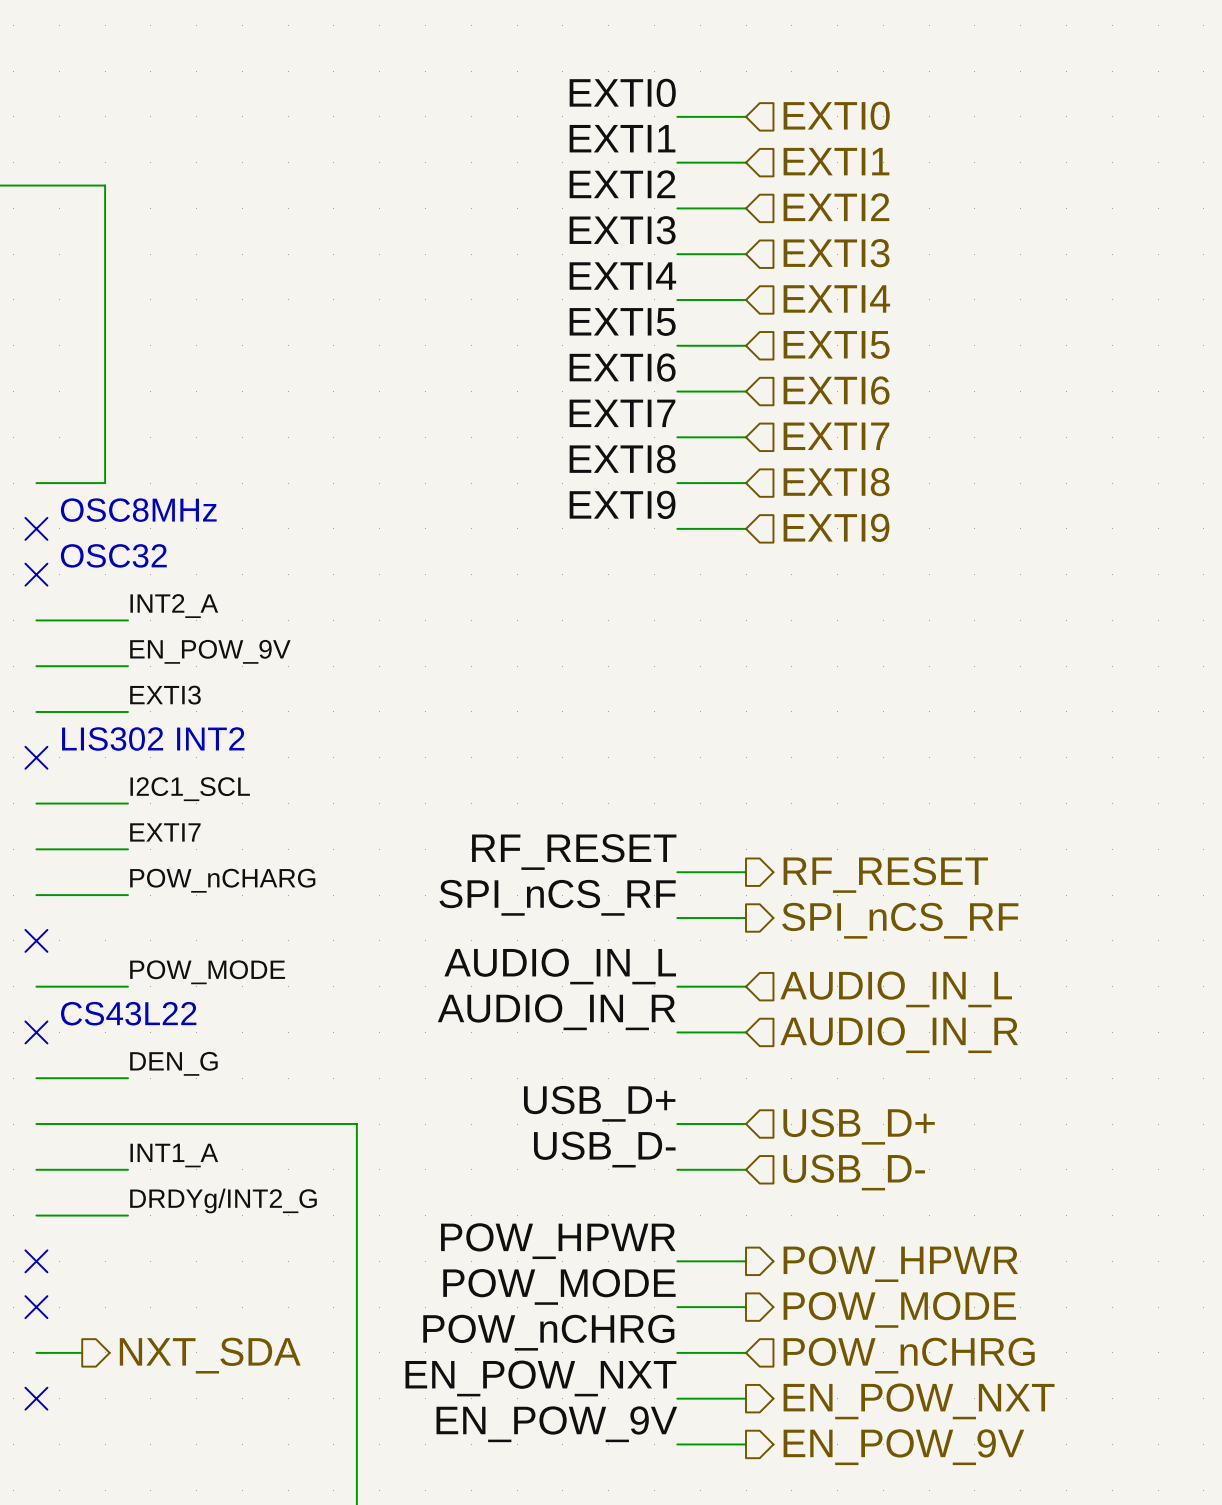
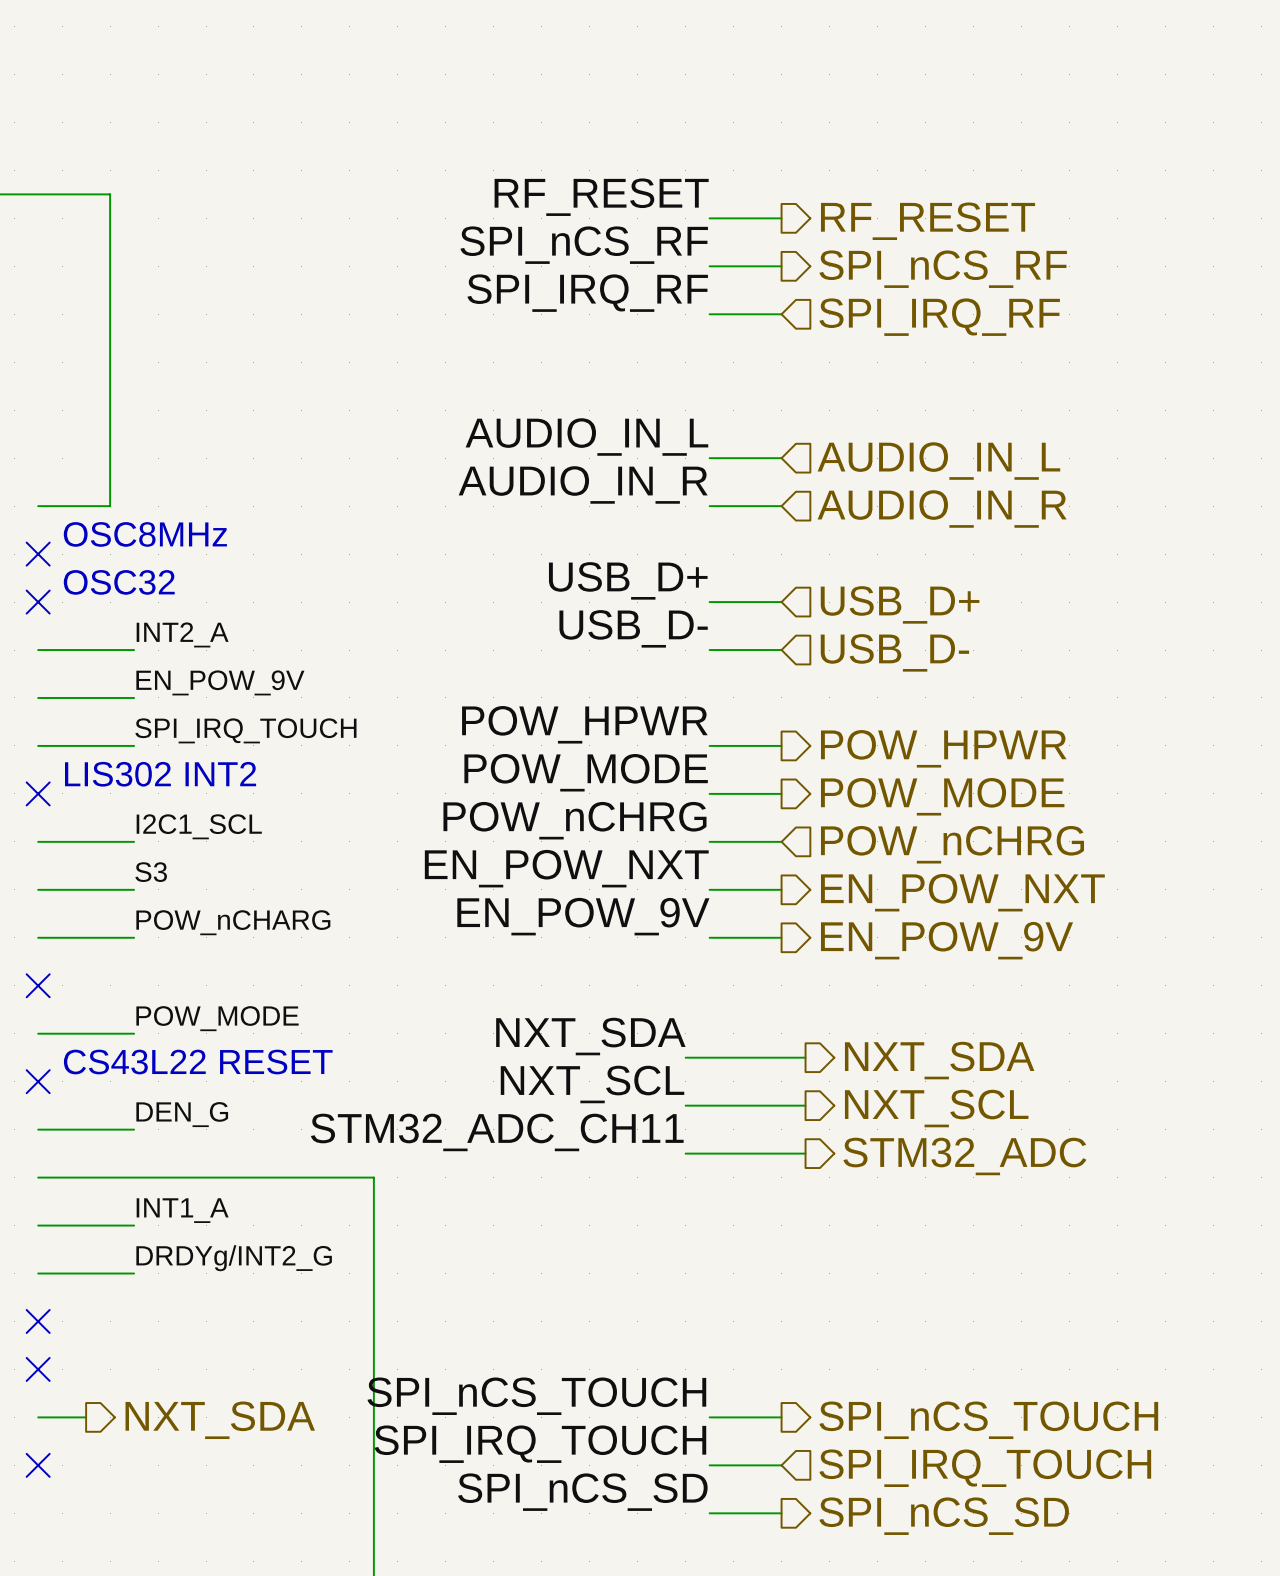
label: EXTI0 (622, 92) -> none
hierarchical label: EXTI0 (836, 115) -> none
wire: (677, 116) (746, 116) -> none
label: EXTI1 (622, 138) -> none
hierarchical label: EXTI1 (836, 161) -> none
wire: (677, 162) (746, 162) -> none
label: EXTI2 (622, 184) -> RF_RESET (601, 197)
hierarchical label shape: input (836, 207) -> output (928, 221)
hierarchical label: EXTI2 (836, 207) -> RF_RESET (928, 221)
label: EXTI3 (622, 230) -> SPI_nCS_RF (584, 245)
hierarchical label shape: input (836, 253) -> output (943, 269)
hierarchical label: EXTI3 (836, 253) -> SPI_nCS_RF (943, 269)
label: EXTI4 (622, 276) -> SPI_IRQ_RF (587, 293)
hierarchical label: EXTI4 (836, 298) -> SPI_IRQ_RF (939, 317)
label: EXTI5 (622, 322) -> none
hierarchical label: EXTI5 (836, 344) -> none
wire: (677, 345) (746, 345) -> none
label: EXTI6 (622, 367) -> none
hierarchical label: EXTI6 (836, 390) -> none
wire: (677, 391) (746, 391) -> (709, 841) (781, 841)
label: EXTI7 (622, 413) -> AUDIO_IN_L (586, 437)
hierarchical label: EXTI7 (836, 436) -> AUDIO_IN_L (938, 461)
label: EXTI8 (622, 459) -> AUDIO_IN_R (583, 484)
hierarchical label: EXTI8 (836, 482) -> AUDIO_IN_R (942, 509)
label: EXTI9 (622, 504) -> none
hierarchical label: EXTI9 (836, 527) -> none
wire: (677, 528) (746, 528) -> none
label: none -> USB_D+ (628, 580)
hierarchical label: none -> USB_D+ (900, 604)
label: none -> USB_D- (633, 628)
hierarchical label: none -> USB_D- (894, 652)
label: none -> POW_HPWR (584, 724)
label: EXTI3 (165, 695) -> SPI_IRQ_TOUCH (245, 730)
hierarchical label: none -> POW_HPWR (943, 748)
label: none -> POW_MODE (586, 772)
hierarchical label: none -> POW_MODE (942, 796)
label: none -> POW_nCHRG (574, 820)
hierarchical label: none -> POW_nCHRG (952, 844)
label: none -> EN_POW_NXT (566, 868)
label: EXTI7 (165, 832) -> S3 (151, 872)
label: RF_RESET (574, 852) -> none
hierarchical label: none -> EN_POW_NXT (962, 892)
wire: (677, 872) (746, 872) -> none
label: none -> EN_POW_9V (583, 916)
hierarchical label: RF_RESET (885, 874) -> none
label: SPI_nCS_RF (557, 897) -> none
hierarchical label: none -> EN_POW_9V (947, 940)
wire: (677, 918) (746, 918) -> none
hierarchical label: SPI_nCS_RF (900, 920) -> none
label: AUDIO_IN_L (560, 966) -> none
wire: (677, 986) (746, 986) -> (709, 602) (781, 602)
label: none -> NXT_SDA (590, 1036)
hierarchical label: AUDIO_IN_L (896, 989) -> none
wire: none -> (685, 1057) (805, 1057)
label: AUDIO_IN_R (556, 1012) -> none
hierarchical label: none -> NXT_SDA (939, 1060)
text: CS43L22 (128, 1013) -> CS43L22 RESET (198, 1062)
wire: (677, 1032) (746, 1032) -> (709, 650) (781, 650)
label: none -> NXT_SCL (592, 1084)
hierarchical label: AUDIO_IN_R (899, 1035) -> none
wire: none -> (685, 1105) (805, 1105)
hierarchical label: none -> NXT_SCL (936, 1108)
label: none -> STM32_ADC_CH11 (497, 1132)
wire: none -> (685, 1153) (805, 1153)
label: USB_D+ (599, 1103) -> none
hierarchical label: none -> STM32_ADC (964, 1156)
wire: (677, 1124) (746, 1124) -> (709, 745) (781, 745)
hierarchical label: USB_D+ (859, 1126) -> none
label: USB_D- (604, 1149) -> none
wire: (677, 1169) (746, 1169) -> (709, 793) (781, 793)
hierarchical label: USB_D- (854, 1172) -> none
label: POW_HPWR (558, 1241) -> none
wire: (677, 1261) (746, 1261) -> (709, 889) (781, 889)
hierarchical label: POW_HPWR (900, 1264) -> none
label: POW_MODE (559, 1286) -> none
wire: (677, 1307) (746, 1307) -> (709, 937) (781, 937)
hierarchical label: POW_MODE (899, 1309) -> none
label: POW_nCHRG (548, 1332) -> SPI_nCS_TOUCH (536, 1396)
hierarchical label shape: input (909, 1355) -> output (988, 1420)
hierarchical label: POW_nCHRG (909, 1355) -> SPI_nCS_TOUCH (988, 1420)
label: EN_POW_NXT (540, 1378) -> SPI_IRQ_TOUCH (540, 1444)
hierarchical label shape: output (919, 1401) -> input (985, 1468)
hierarchical label: EN_POW_NXT (919, 1401) -> SPI_IRQ_TOUCH (985, 1468)
label: EN_POW_9V (556, 1424) -> SPI_nCS_SD (582, 1492)
hierarchical label: EN_POW_9V (903, 1447) -> SPI_nCS_SD (944, 1516)

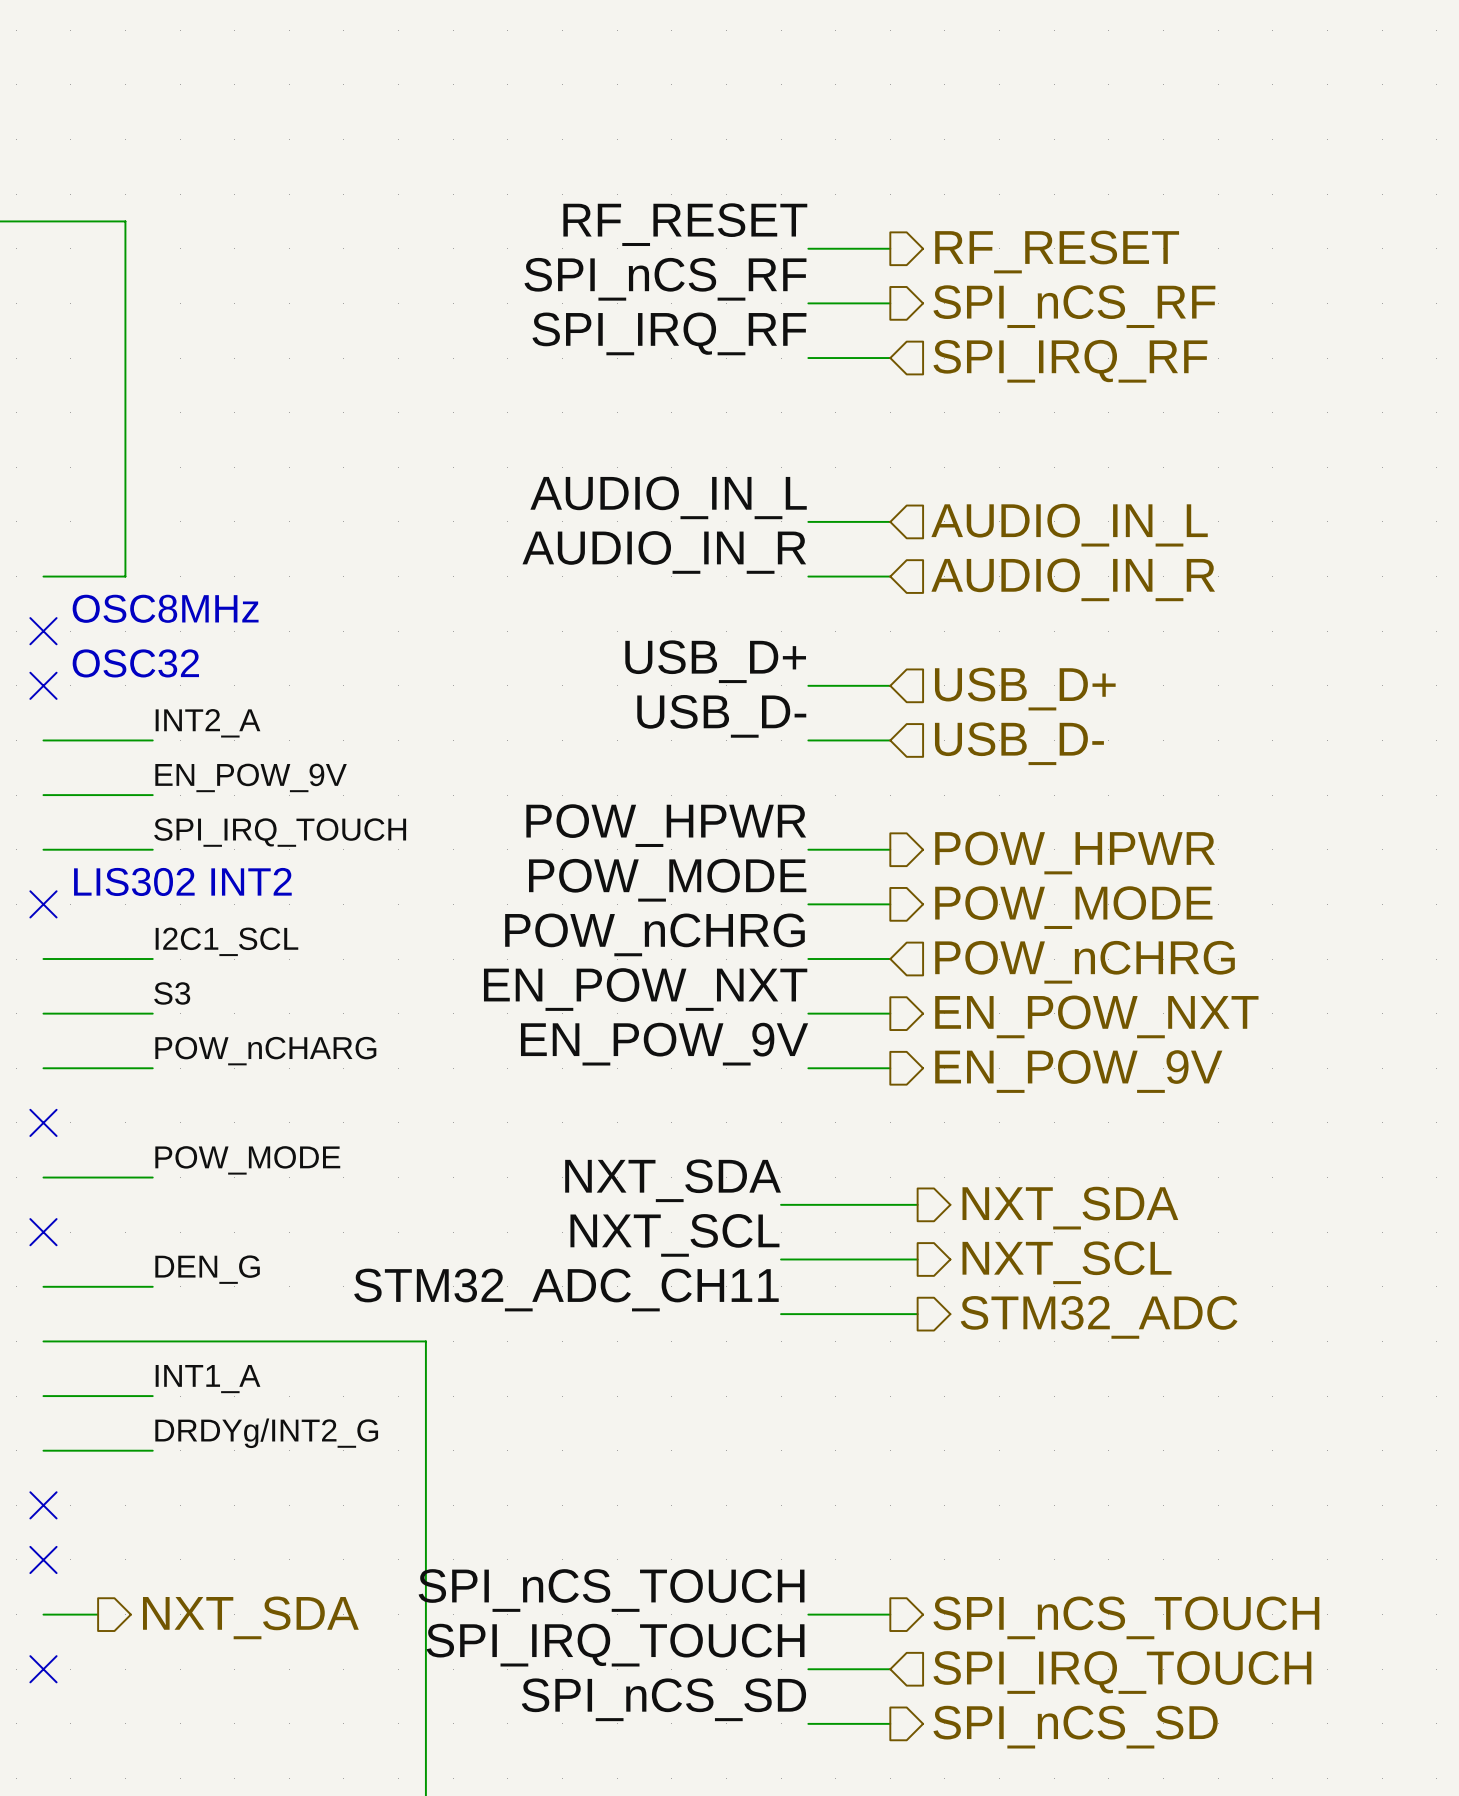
text: CS43L22 RESET (198, 1062) -> none

